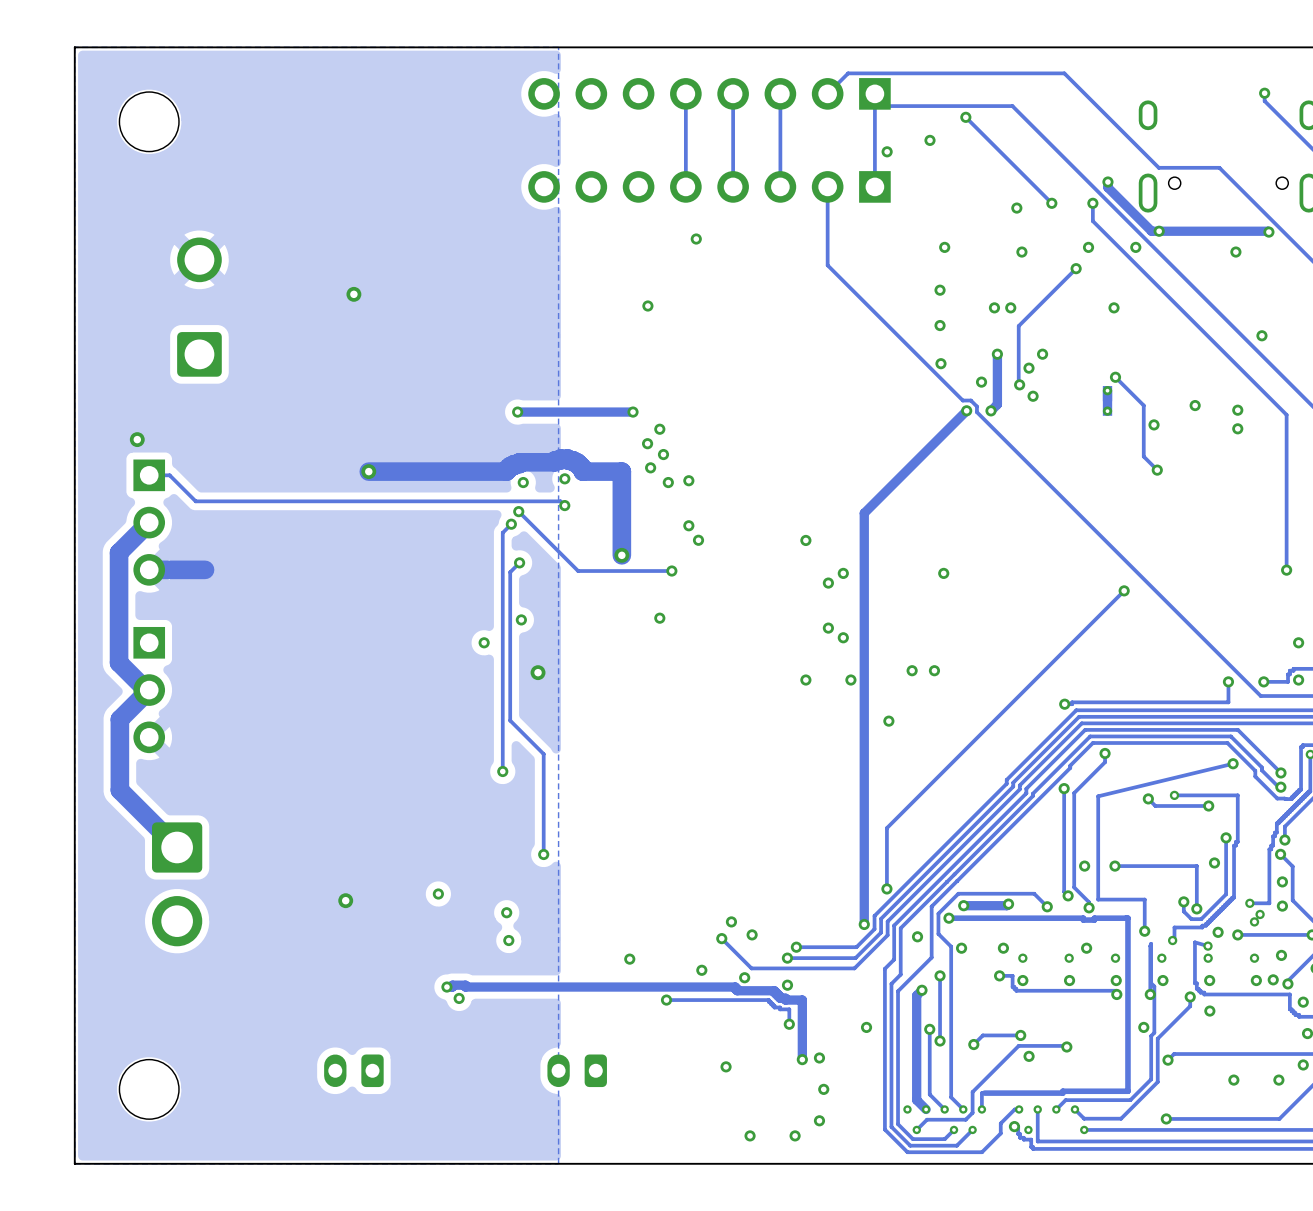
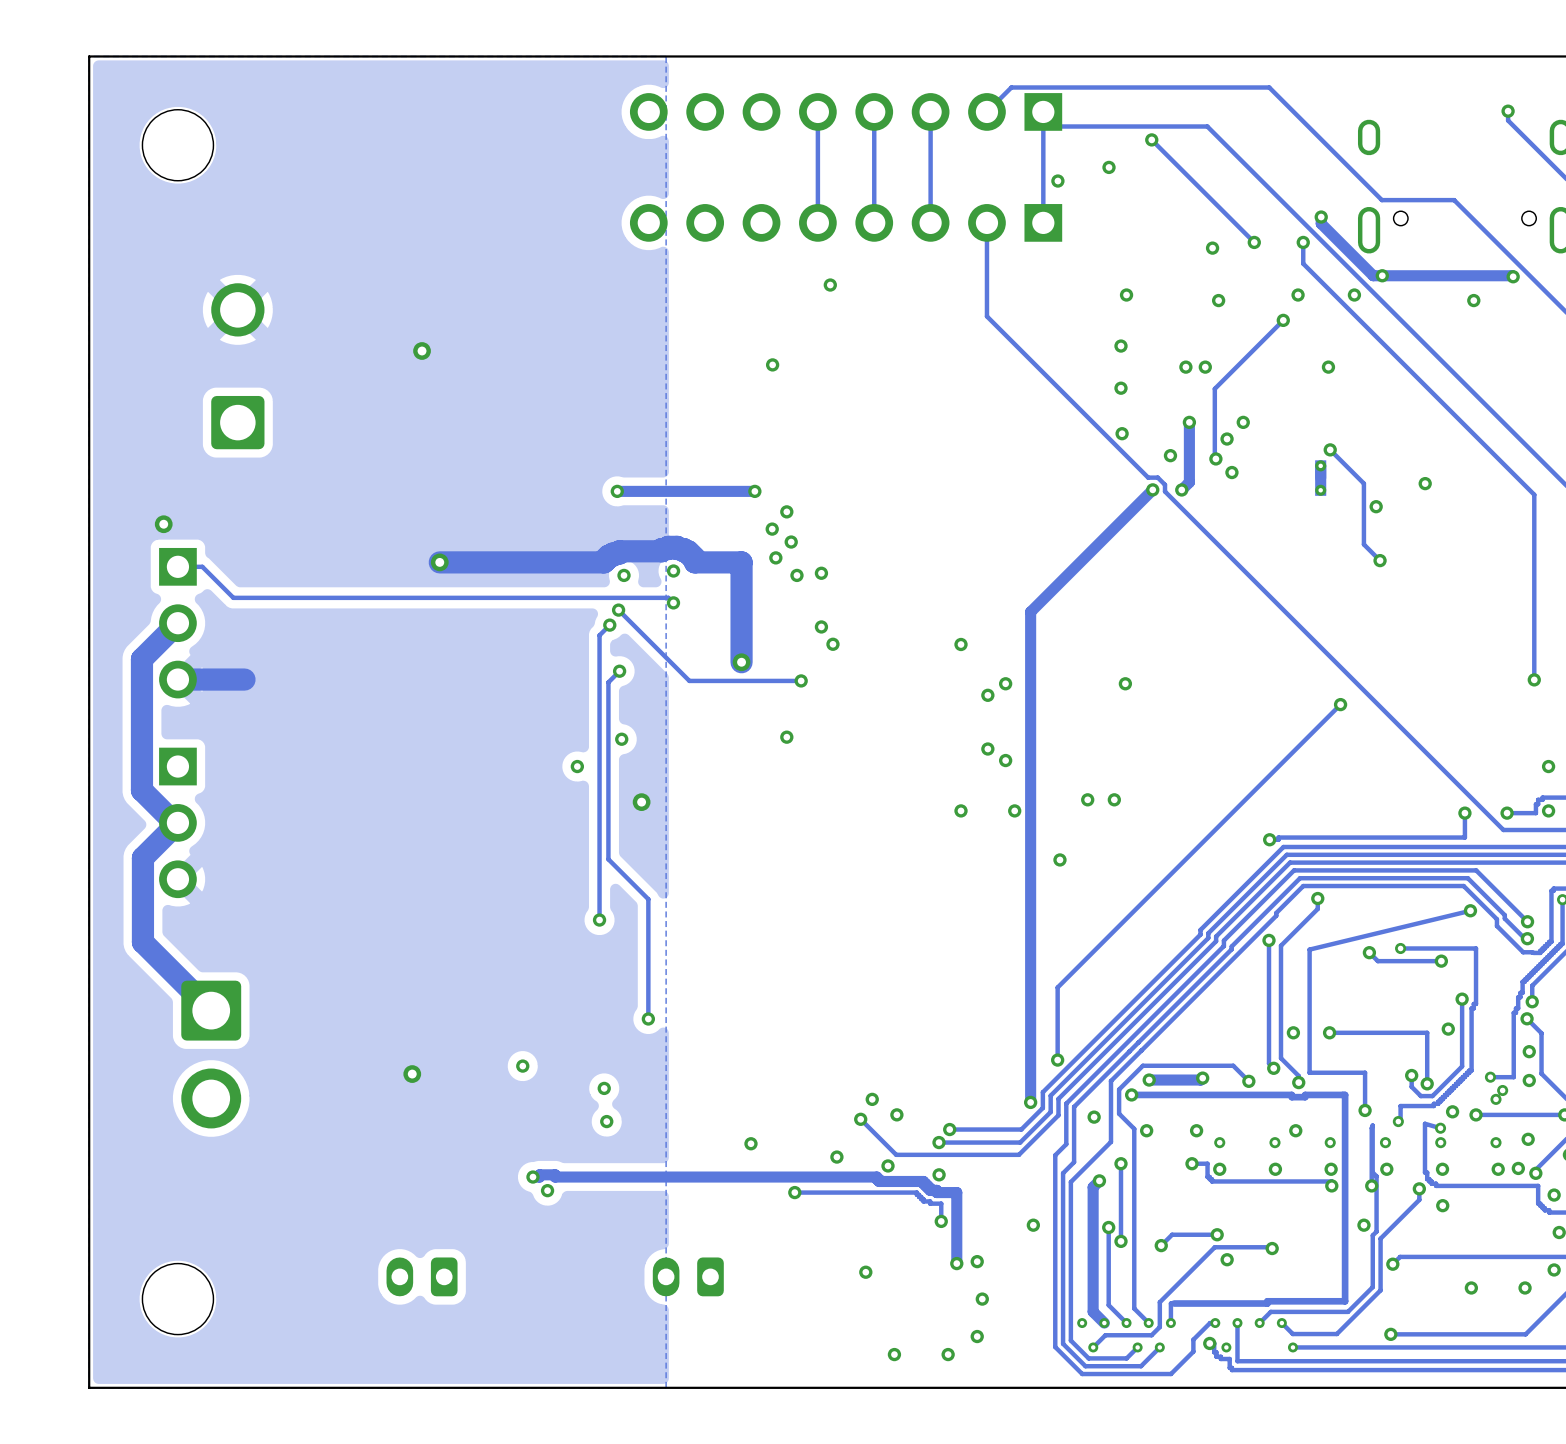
via: (1261, 335) -> none
via: (1237, 410) -> none
via: (1237, 428) -> none

